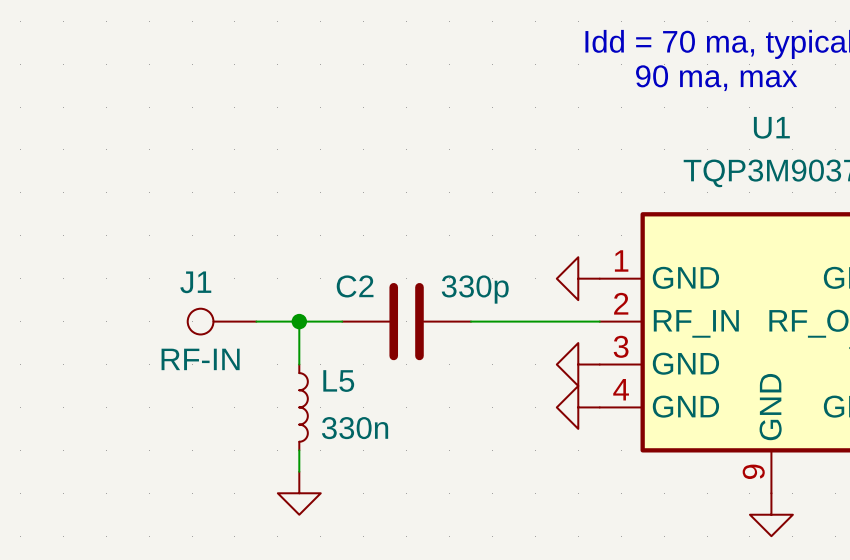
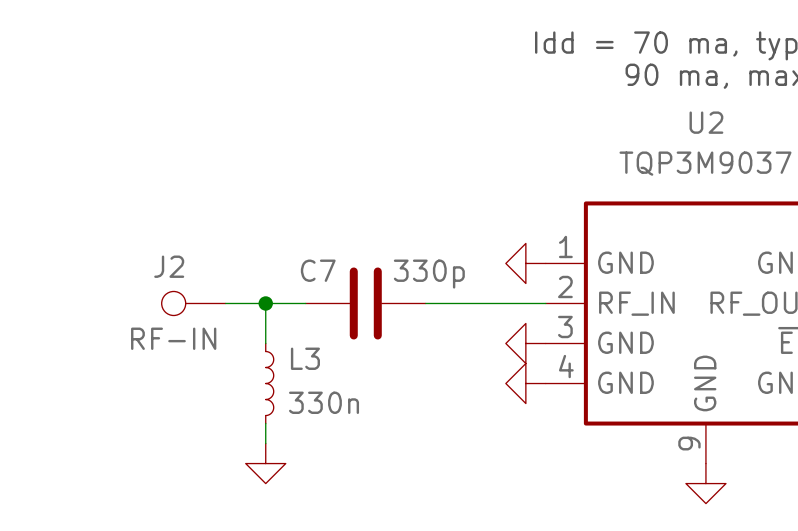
U1 name: U1 (771, 127) -> U2 (706, 122)
J1 name: J1 (195, 282) -> J2 (169, 266)
C2 name: C2 (355, 286) -> C7 (318, 270)
L5 name: L5 (338, 381) -> L3 (305, 358)

